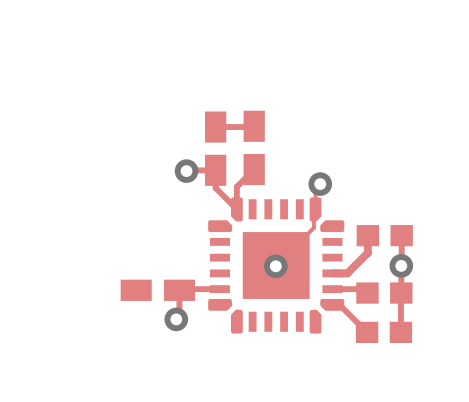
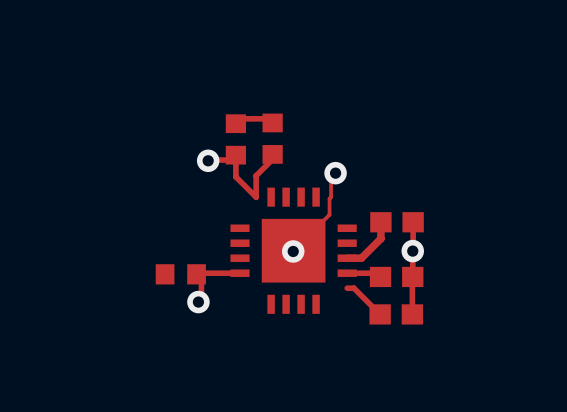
part footprint: [243, 110, 265, 186] -> [262, 113, 283, 164]
part footprint: [205, 111, 227, 186] -> [225, 114, 247, 165]
part footprint: [208, 197, 345, 334] -> [230, 187, 357, 314]
part footprint: [120, 279, 195, 301] -> [155, 264, 206, 285]

